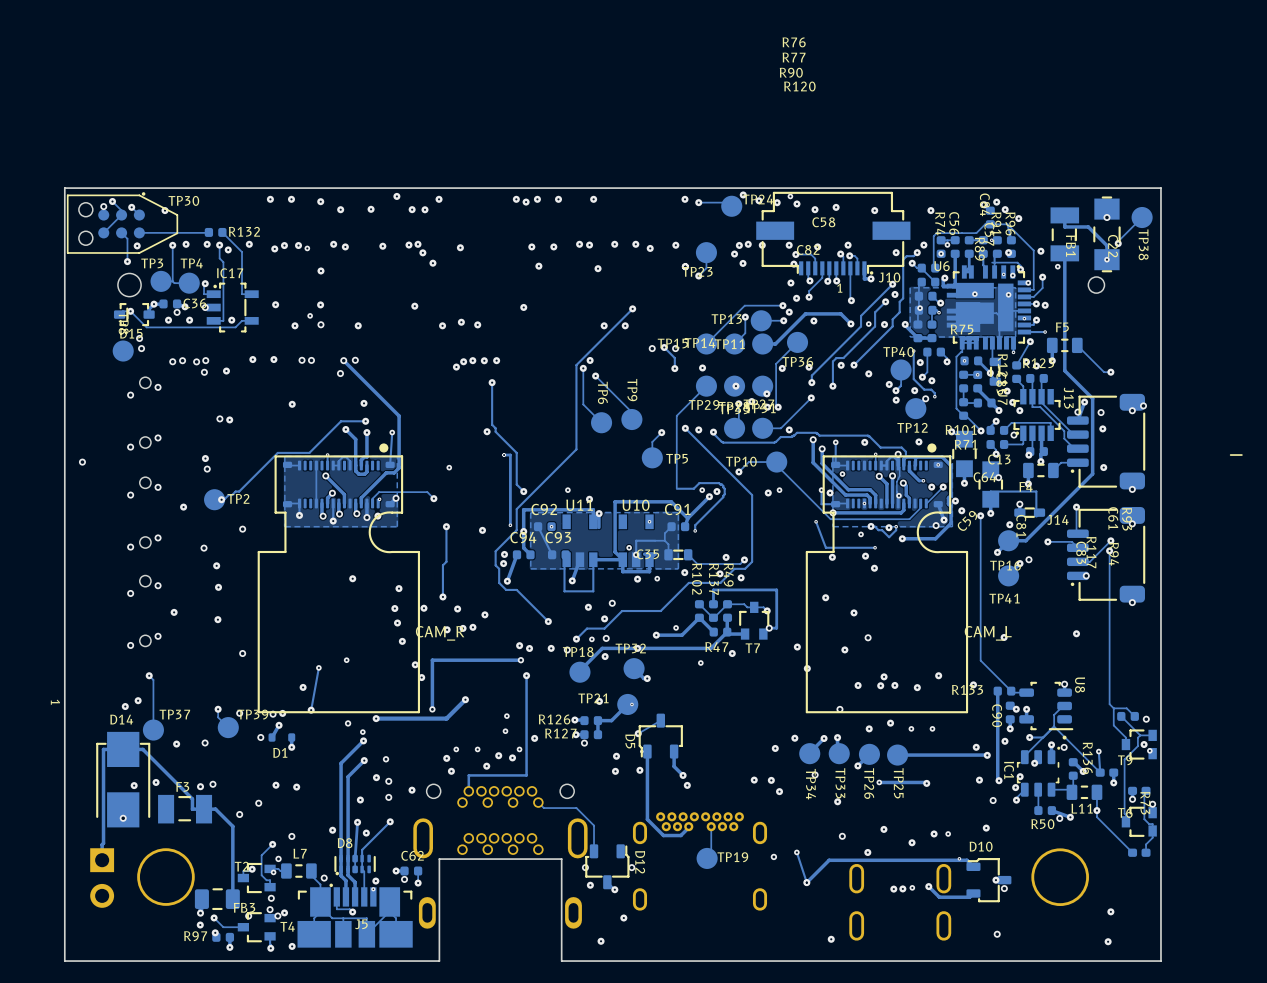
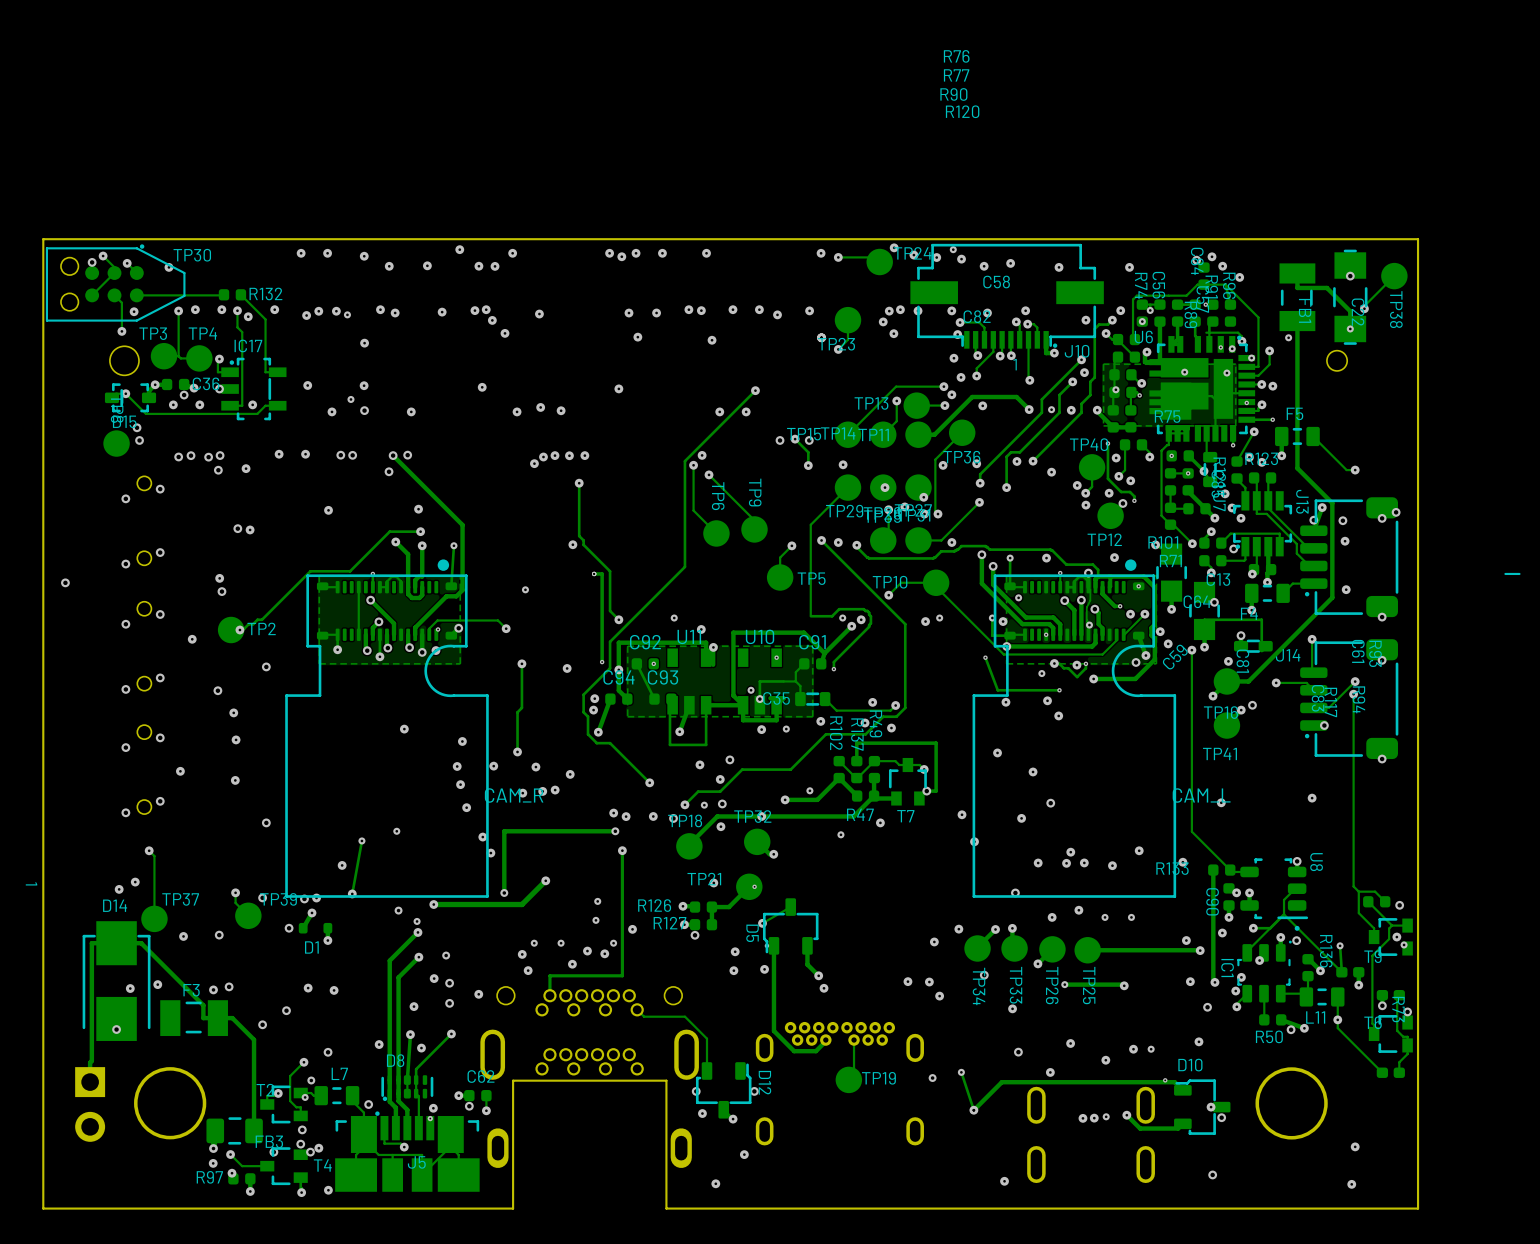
via: (1040, 251) -> none
via: (1008, 252) -> none

